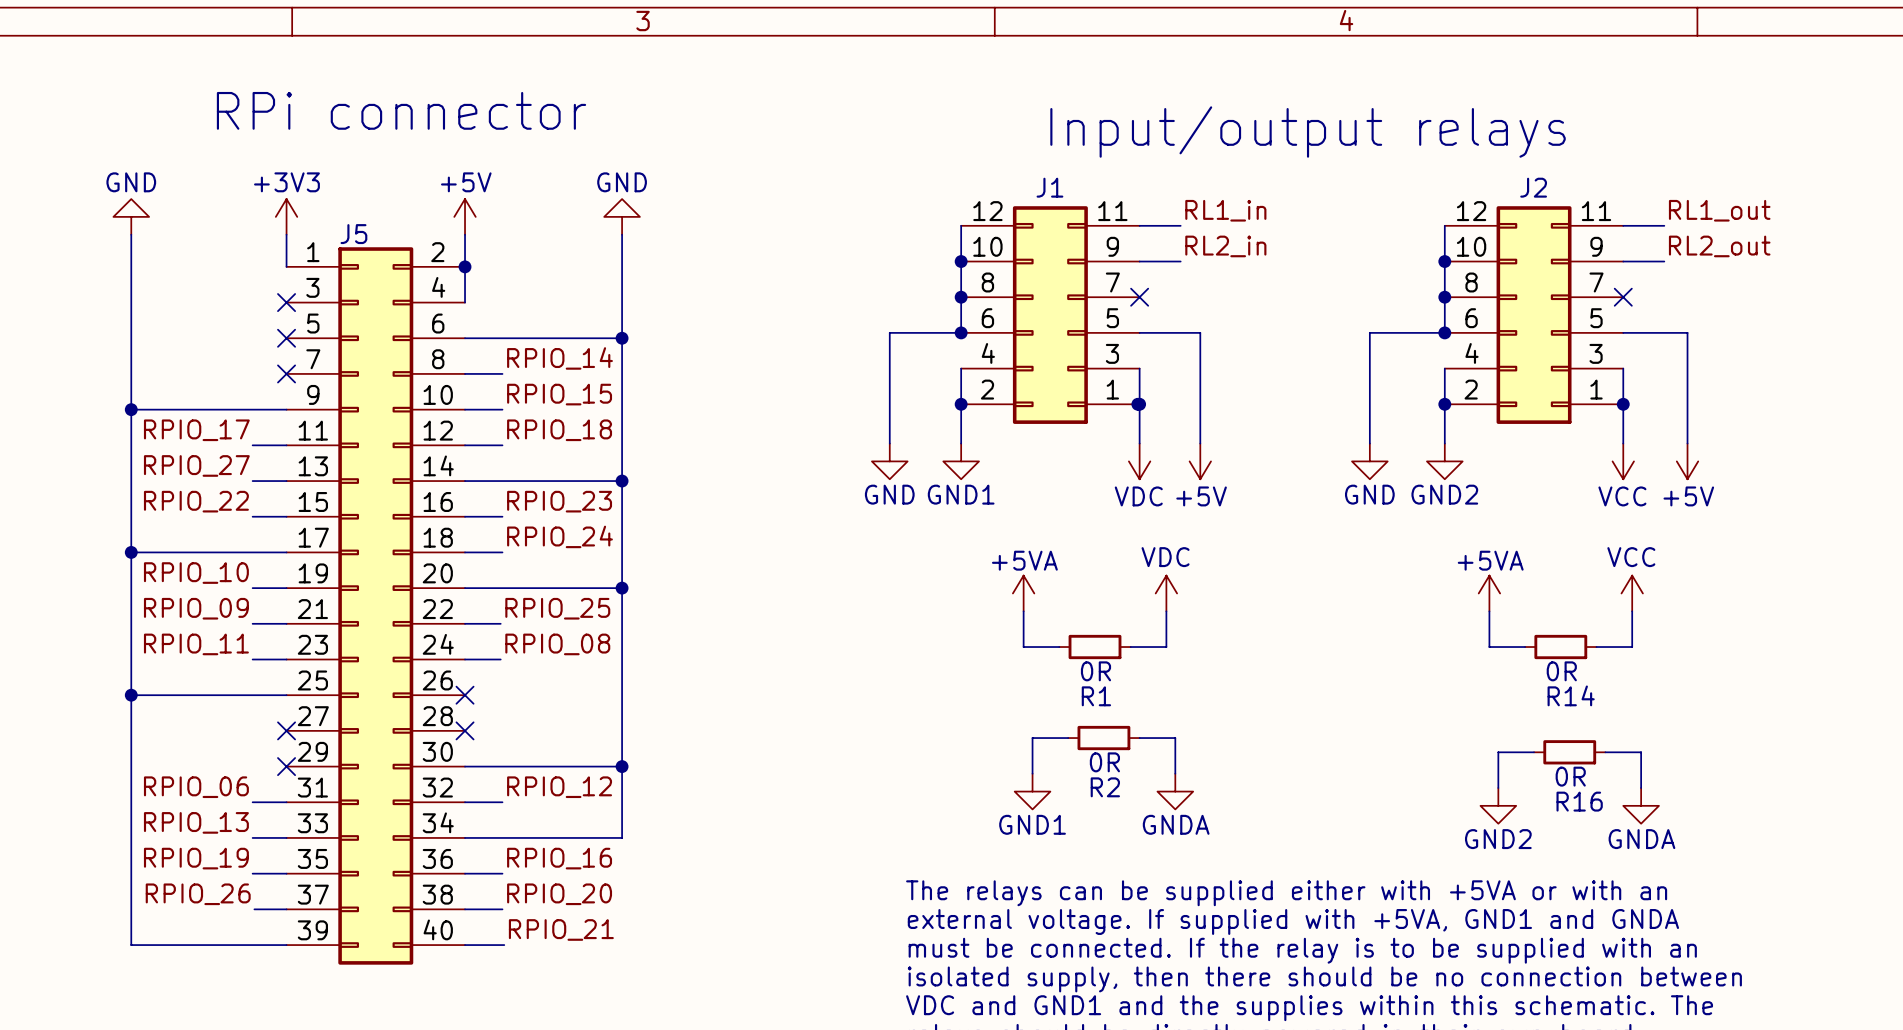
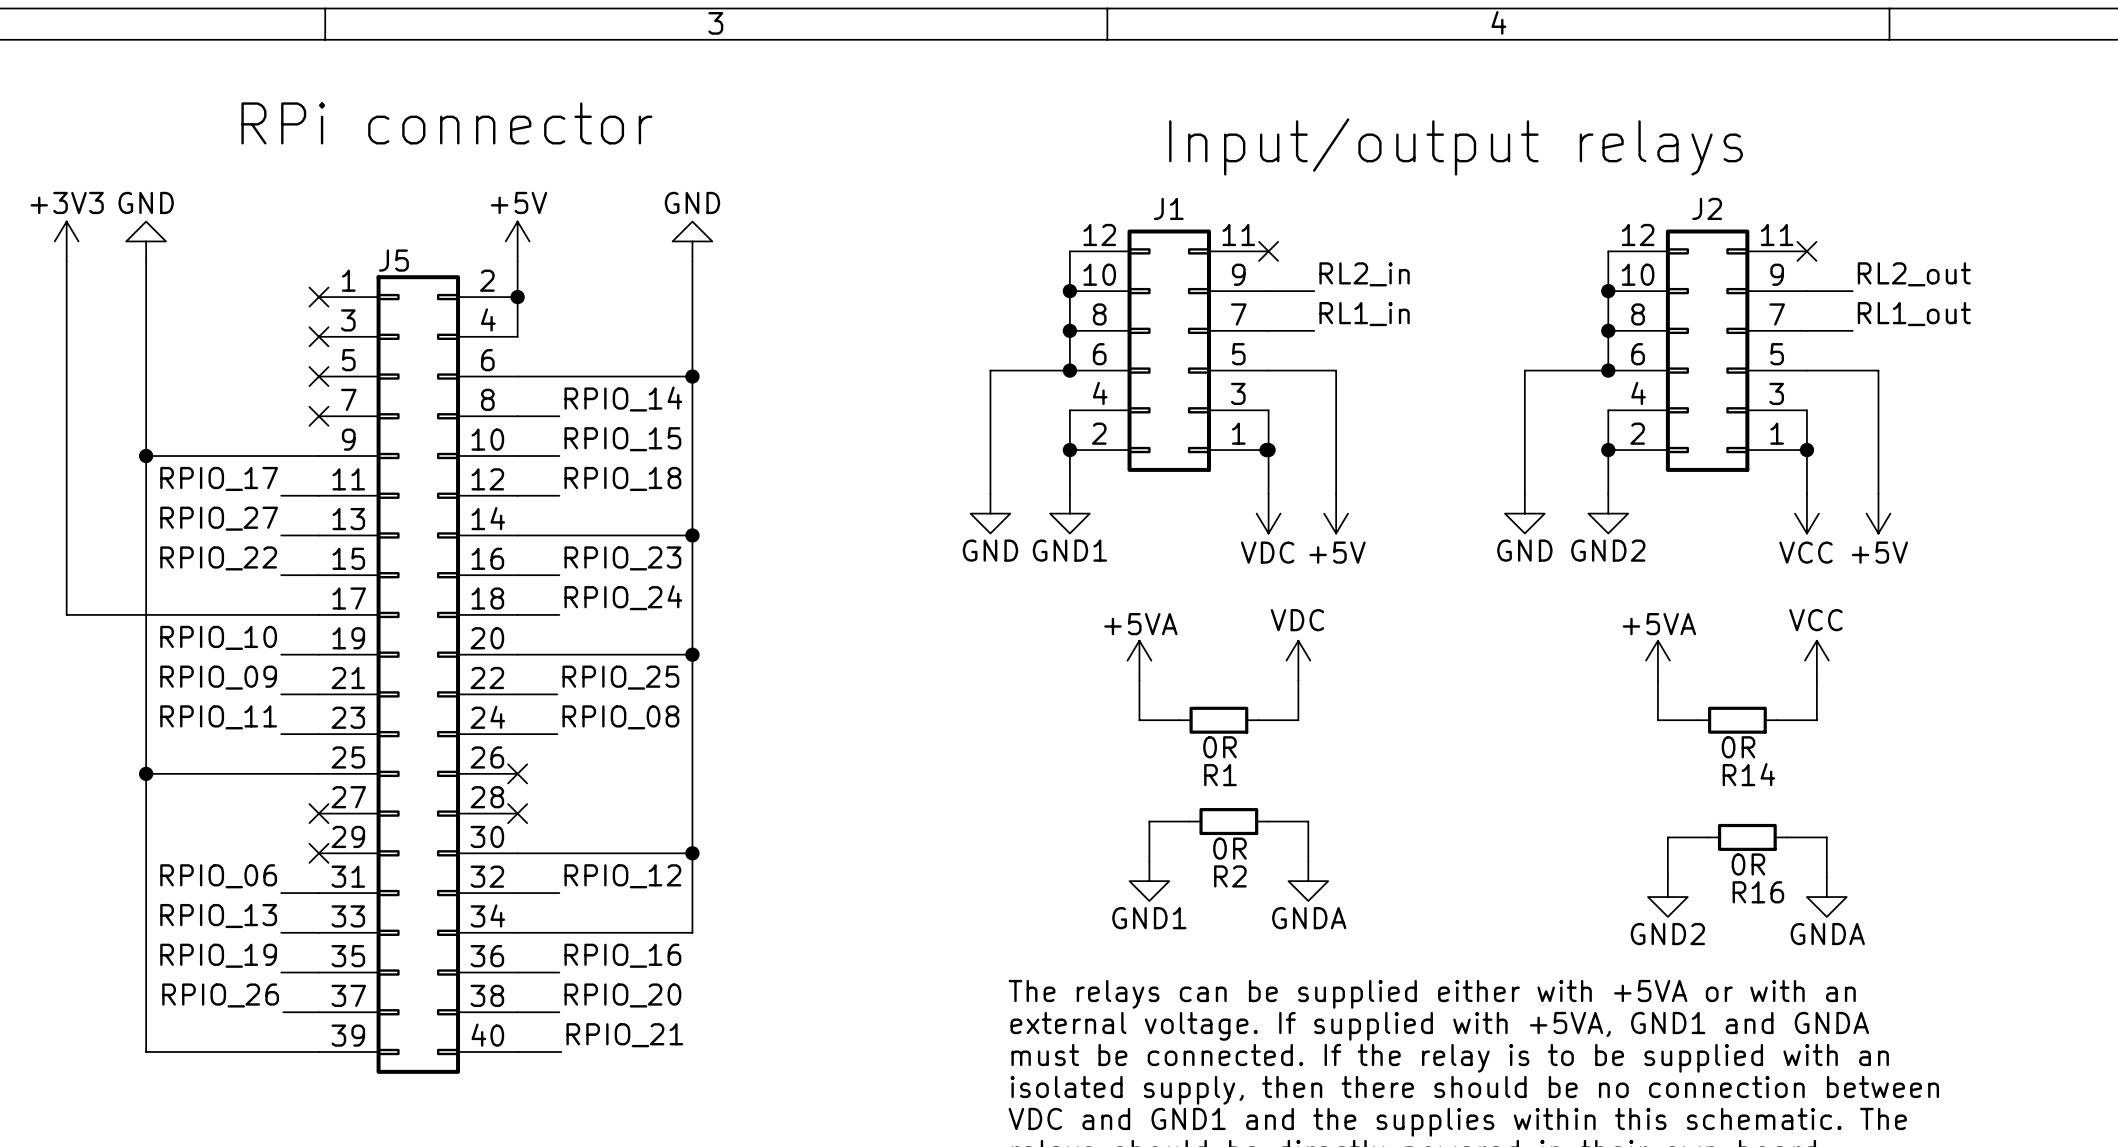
label position: RL1_in (1225, 210) -> RL1_in (1364, 314)
label position: RL1_out (1719, 210) -> RL1_out (1914, 314)
power symbol position: +3V3 (286, 216) -> +3V3 (66, 241)
wire: (1139, 225) (1180, 225) -> (1268, 330) (1314, 330)
wire: (1623, 225) (1664, 225) -> (1806, 330) (1852, 330)
wire: none -> (66, 261) (66, 614) (146, 614)
wire: (286, 234) (286, 266) -> none
no-connect mark: none -> (318, 297)
no-connect mark position: (1139, 297) -> (1268, 251)
no-connect mark position: (1623, 297) -> (1806, 251)
junction: (131, 552) -> none

